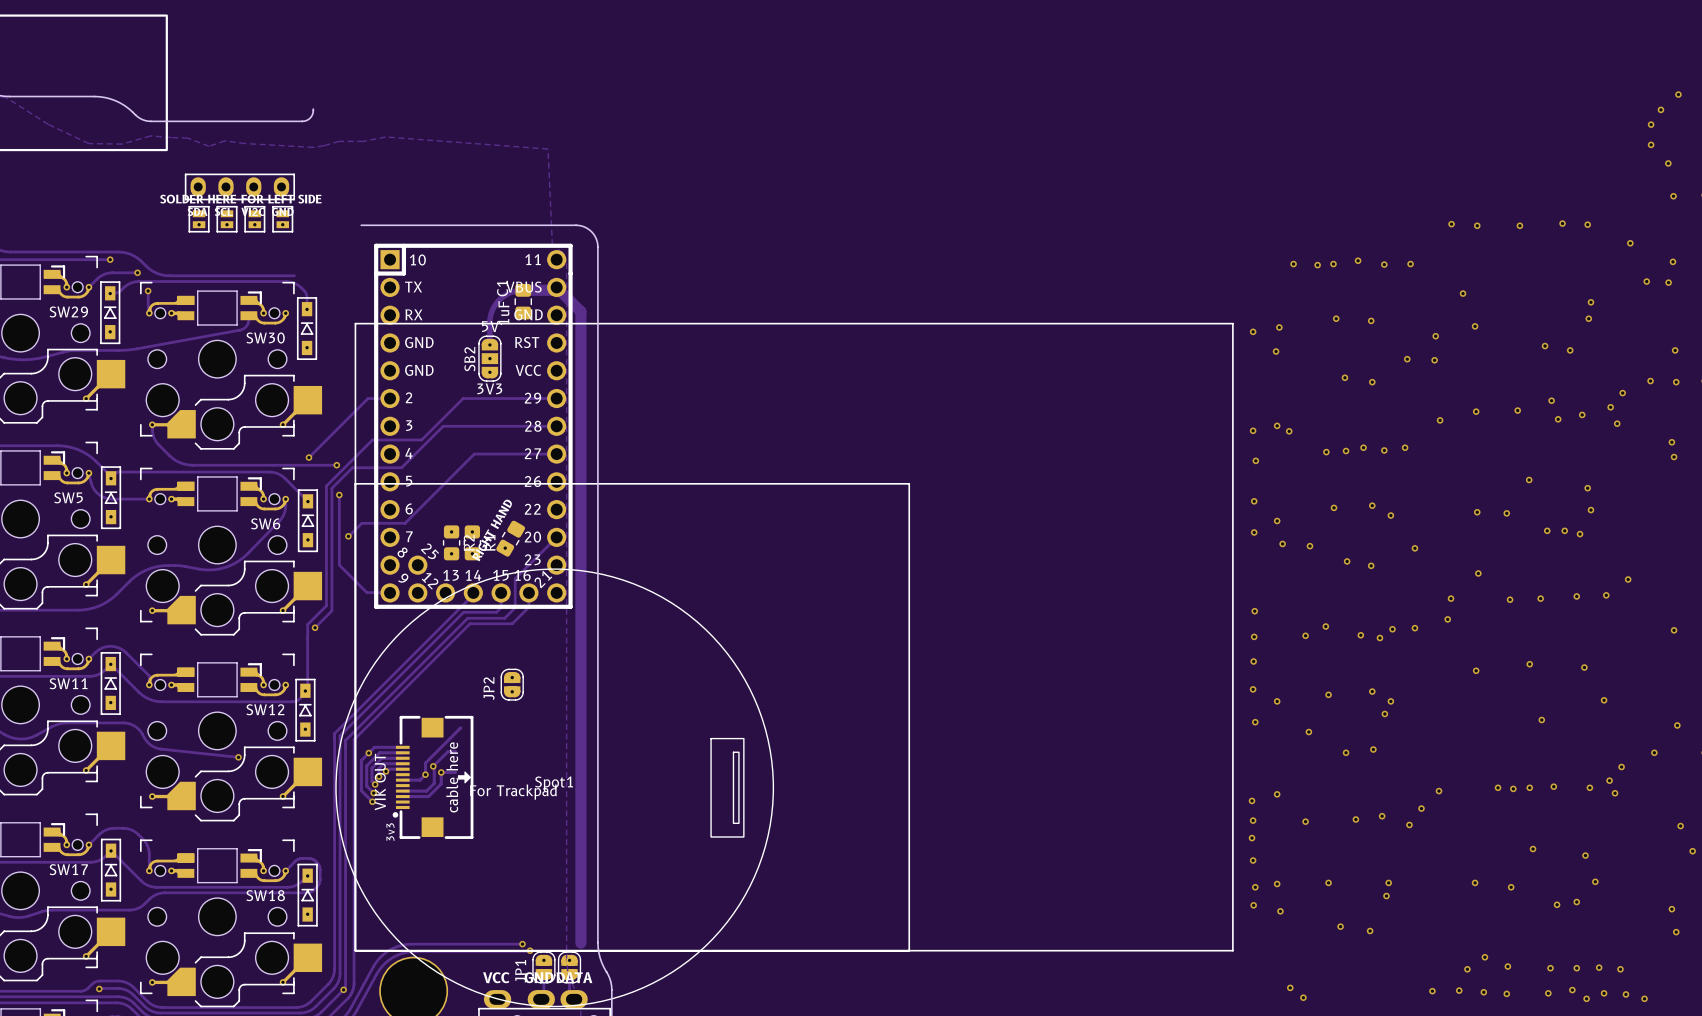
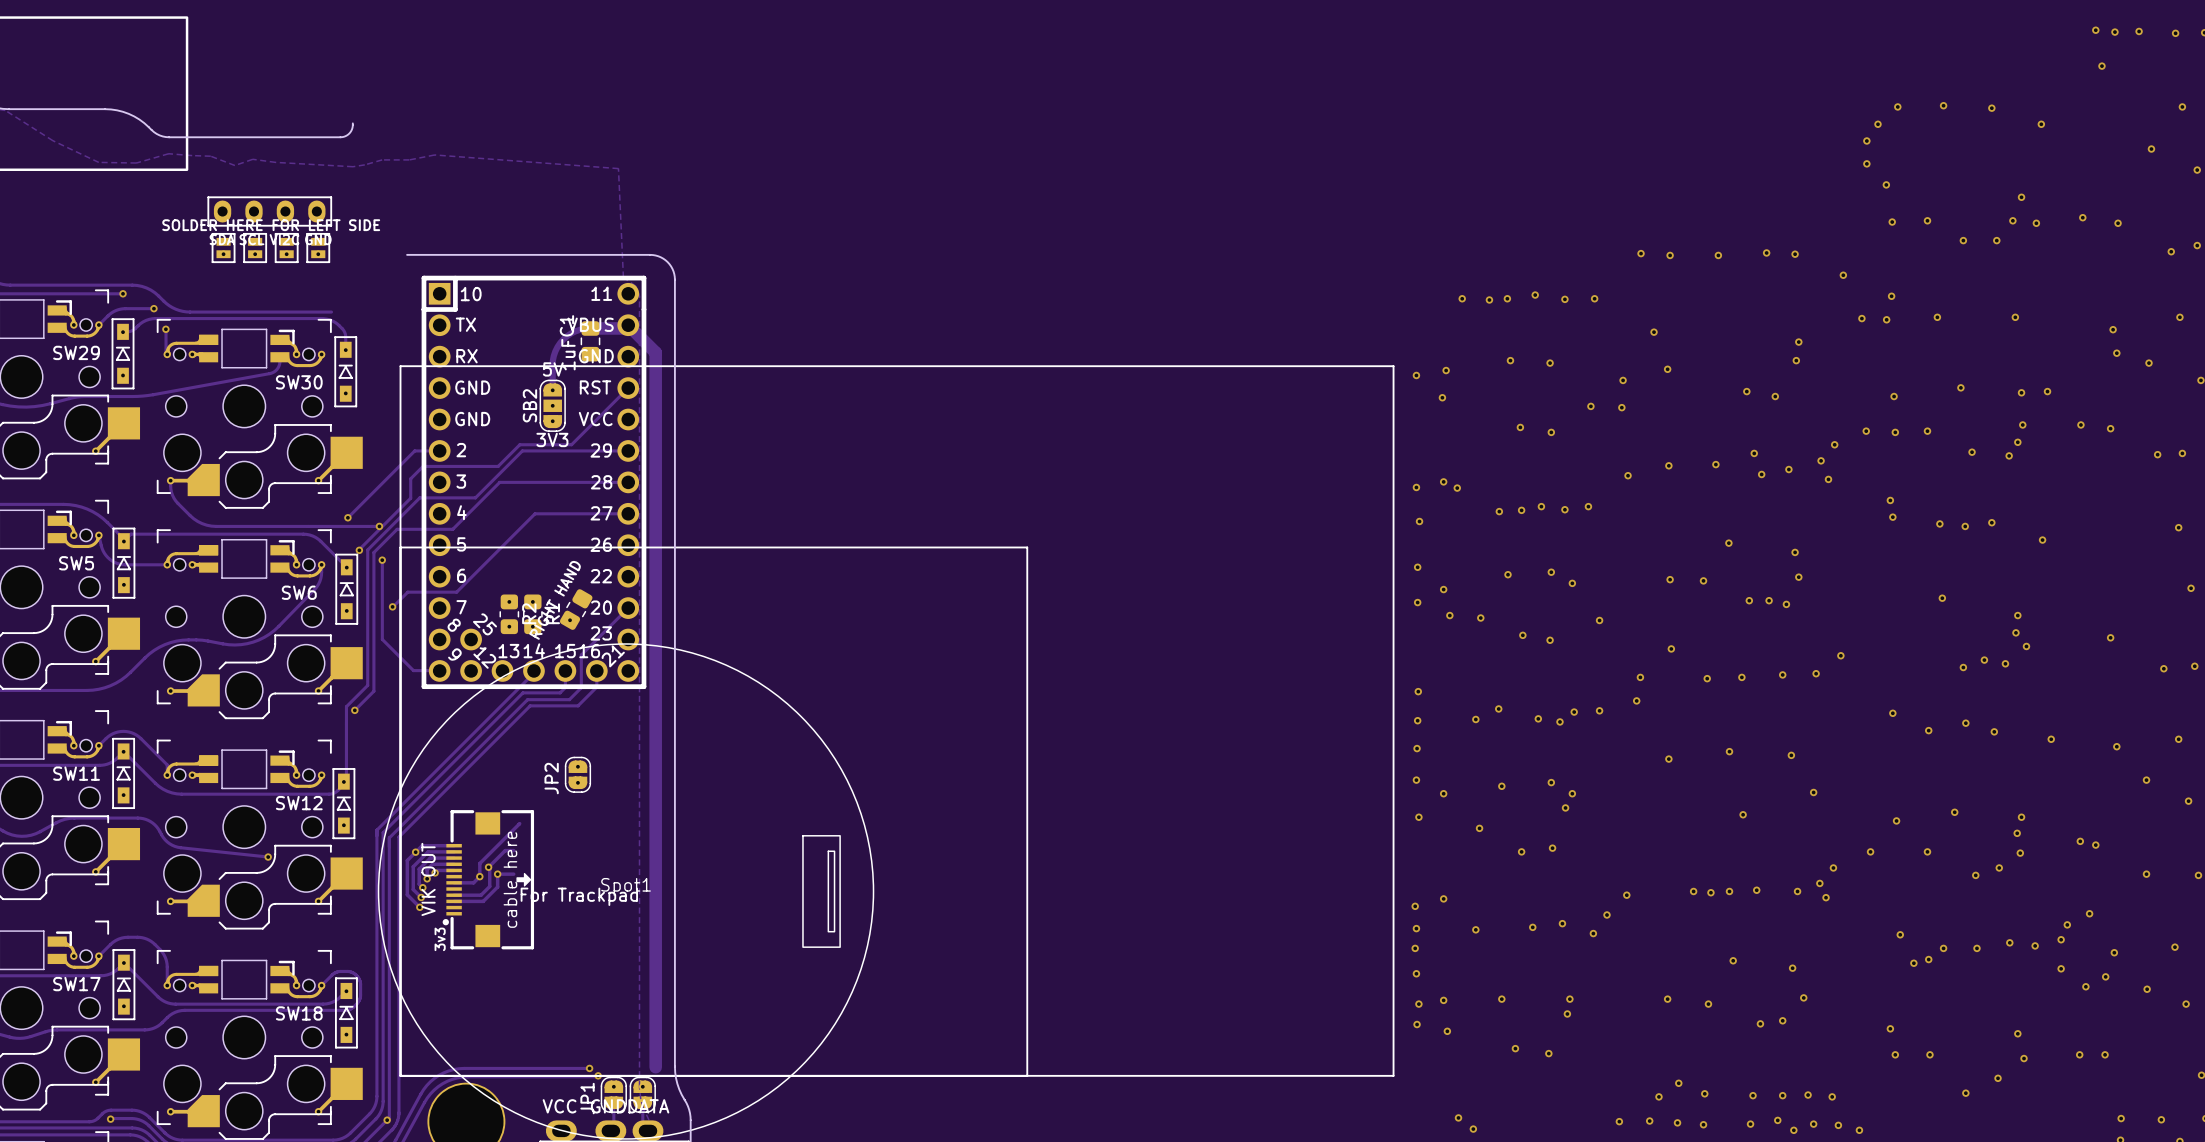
track: none -> (628, 388) (571, 444) (519, 444) (498, 466) (423, 466) (410, 478) (410, 498) (359, 550)
via: none -> (359, 550)

